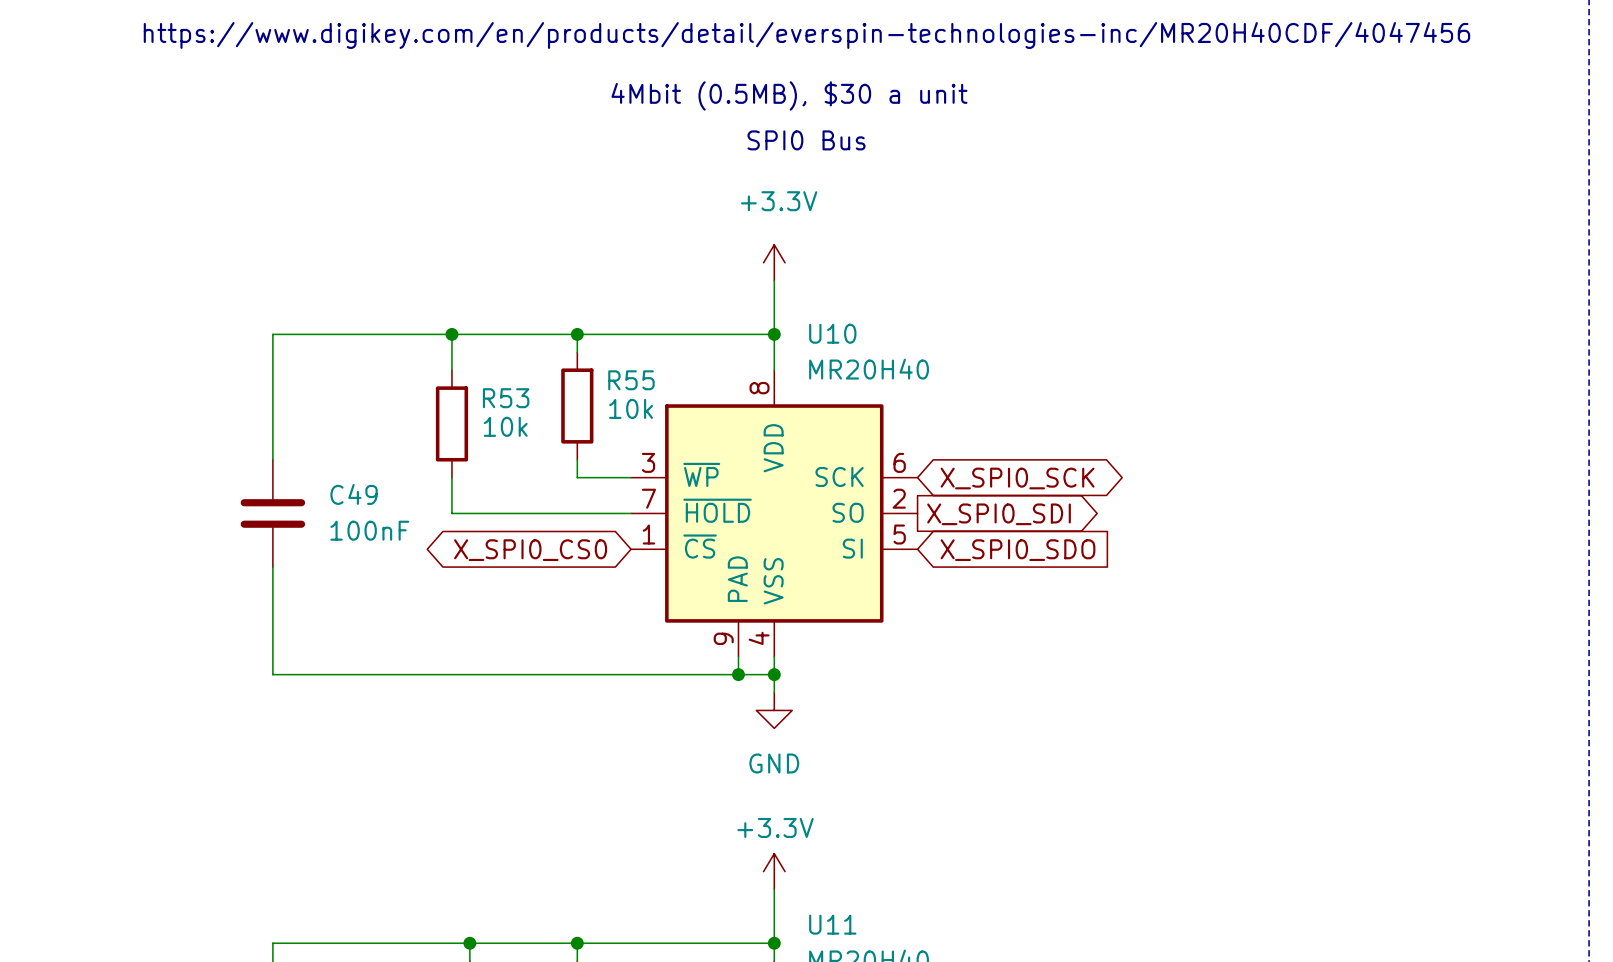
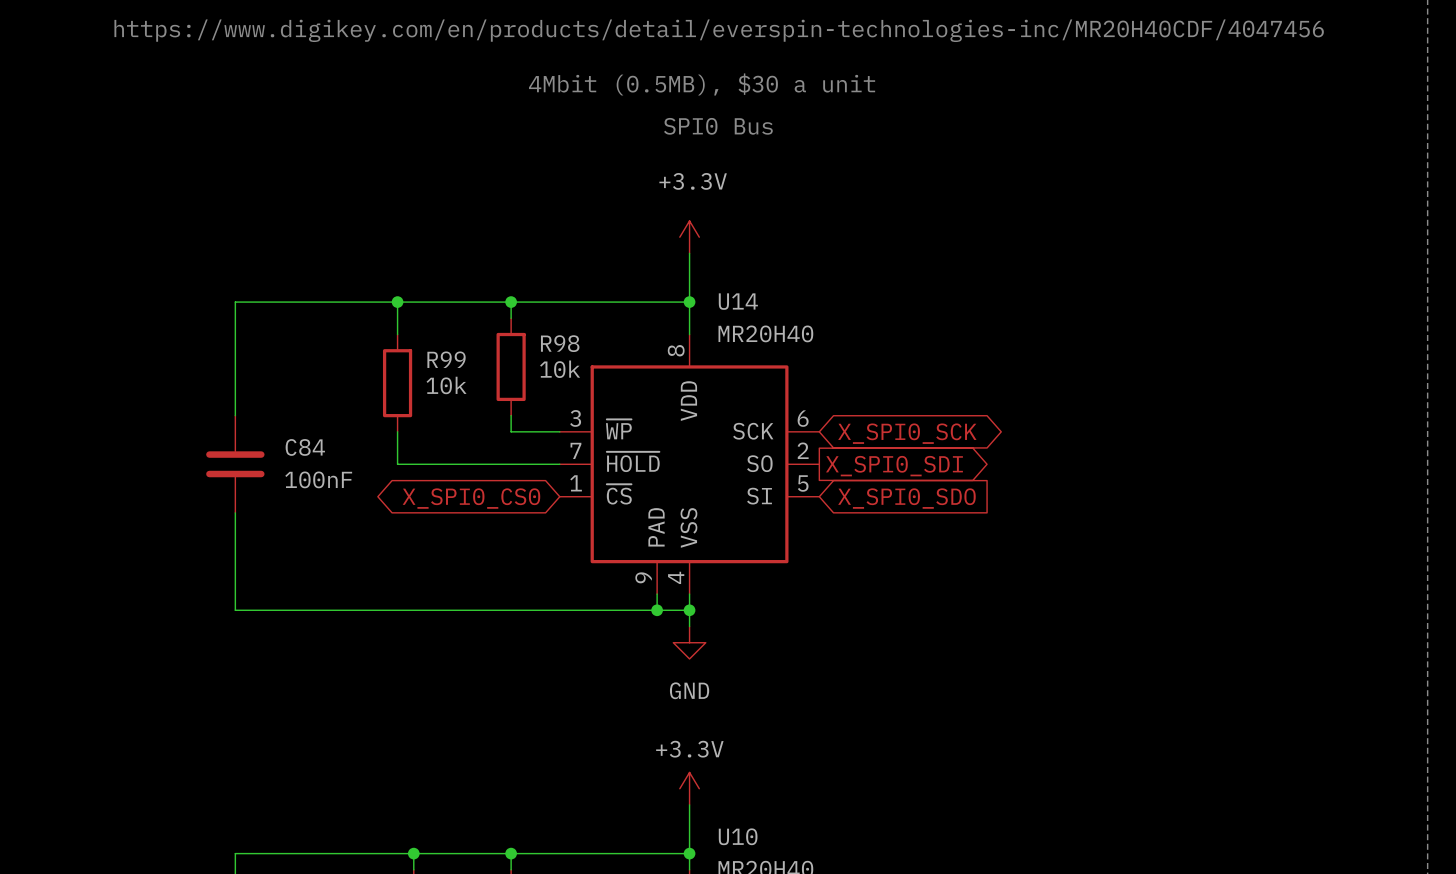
U10 name: U10 (832, 333) -> U14 (738, 301)
R55 name: R55 (631, 380) -> R98 (560, 343)
R53 name: R53 (506, 398) -> R99 (446, 359)
C49 name: C49 (354, 494) -> C84 (305, 447)
U11 name: U11 (832, 924) -> U10 (738, 836)

